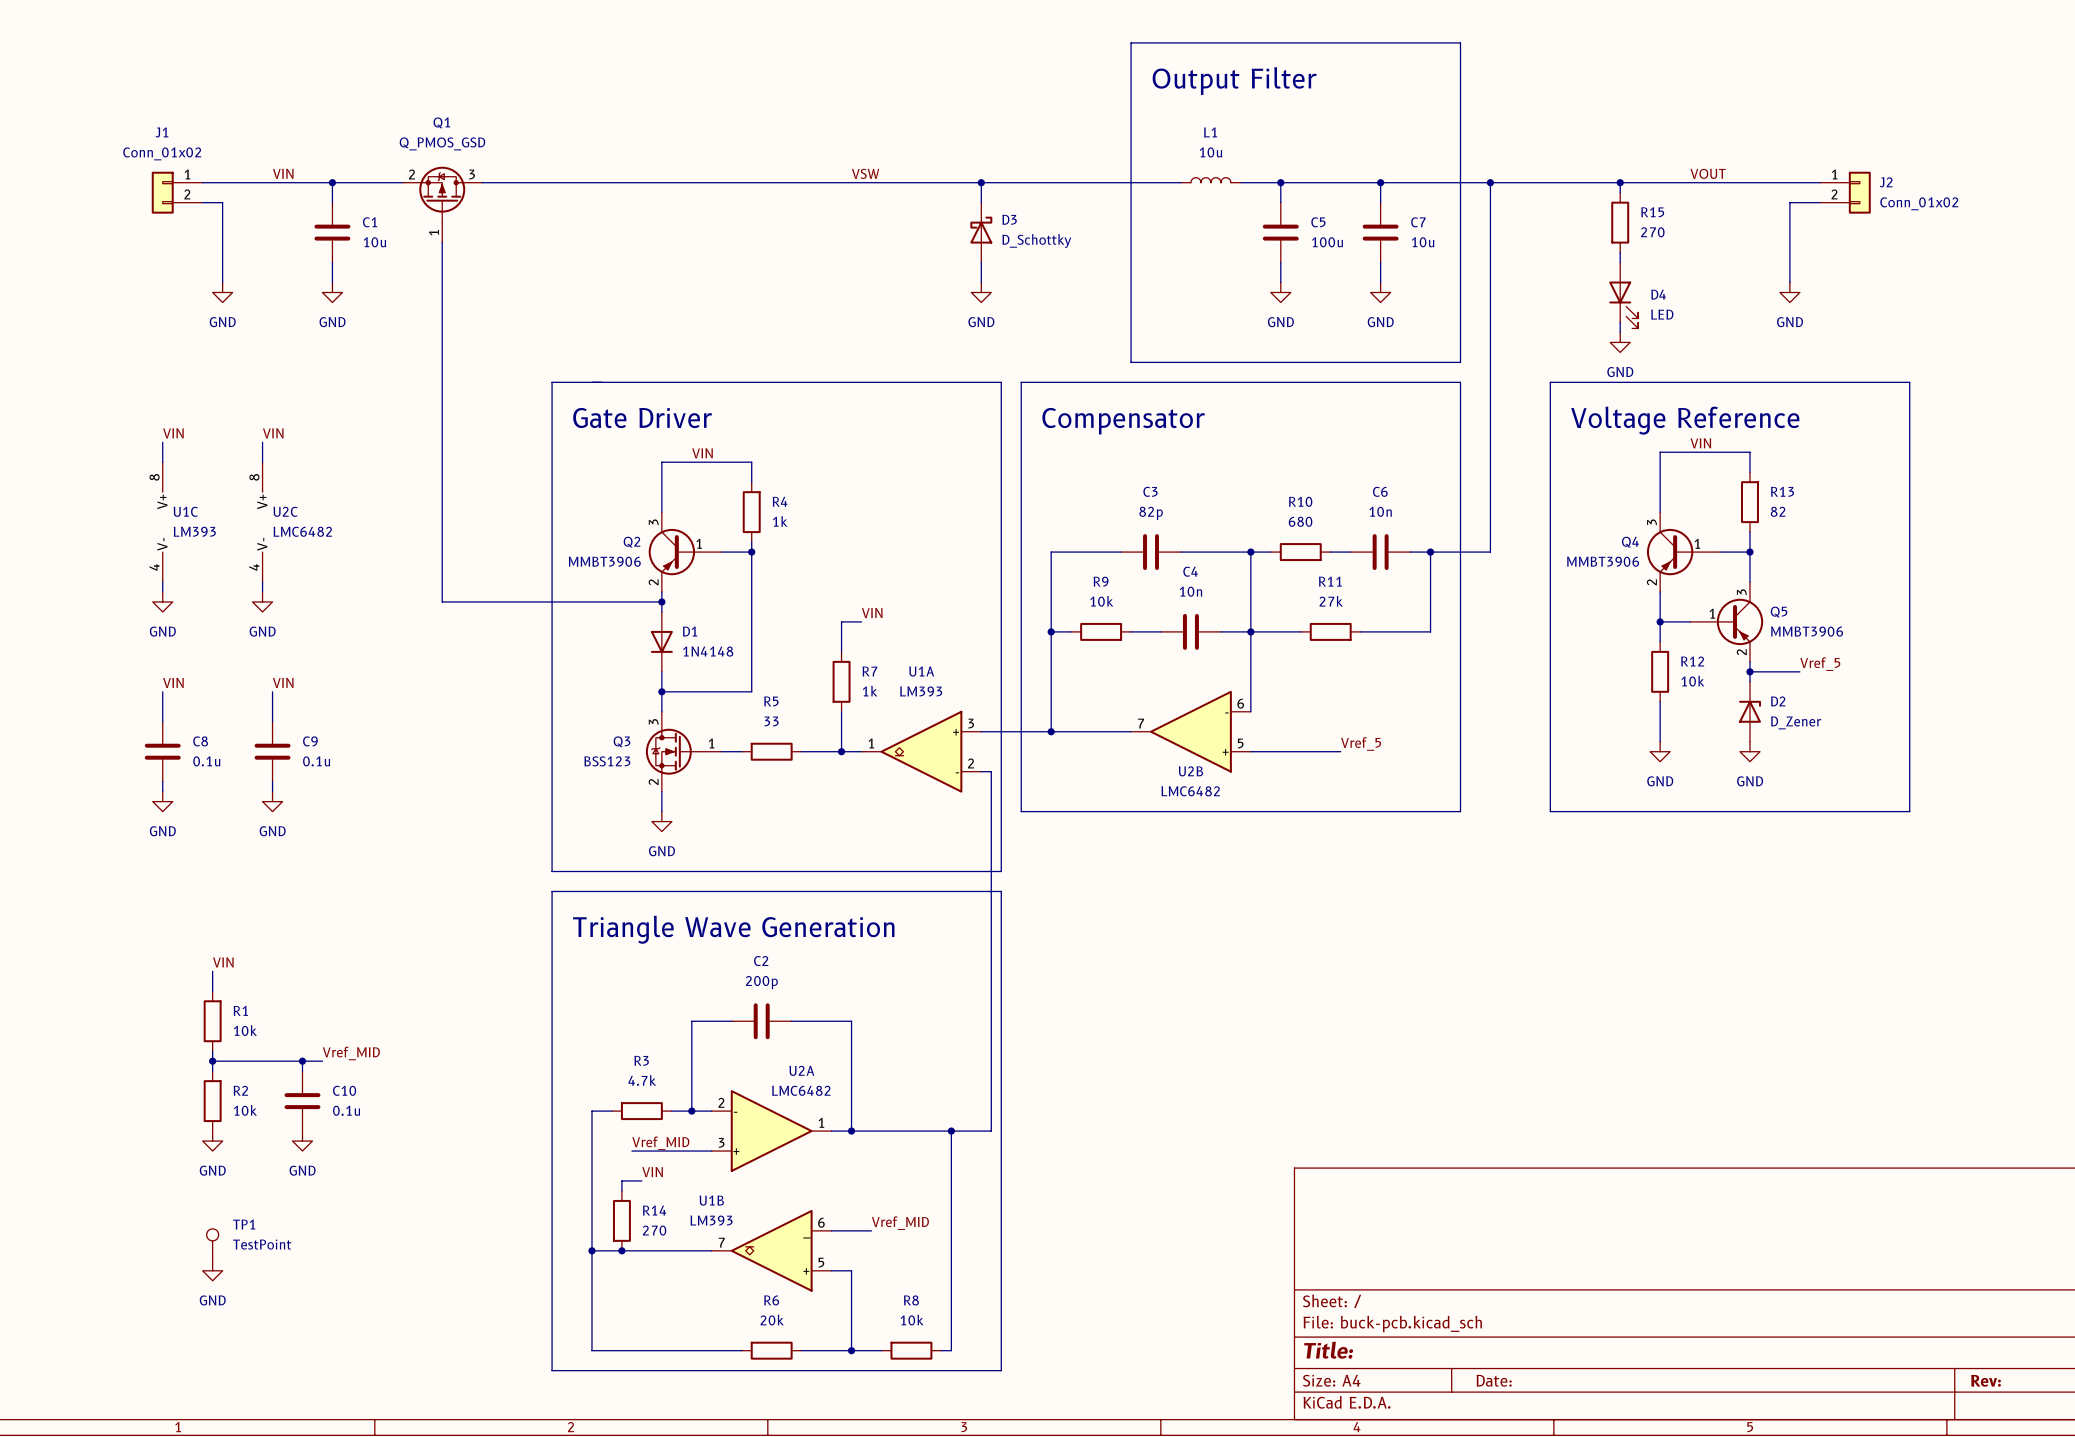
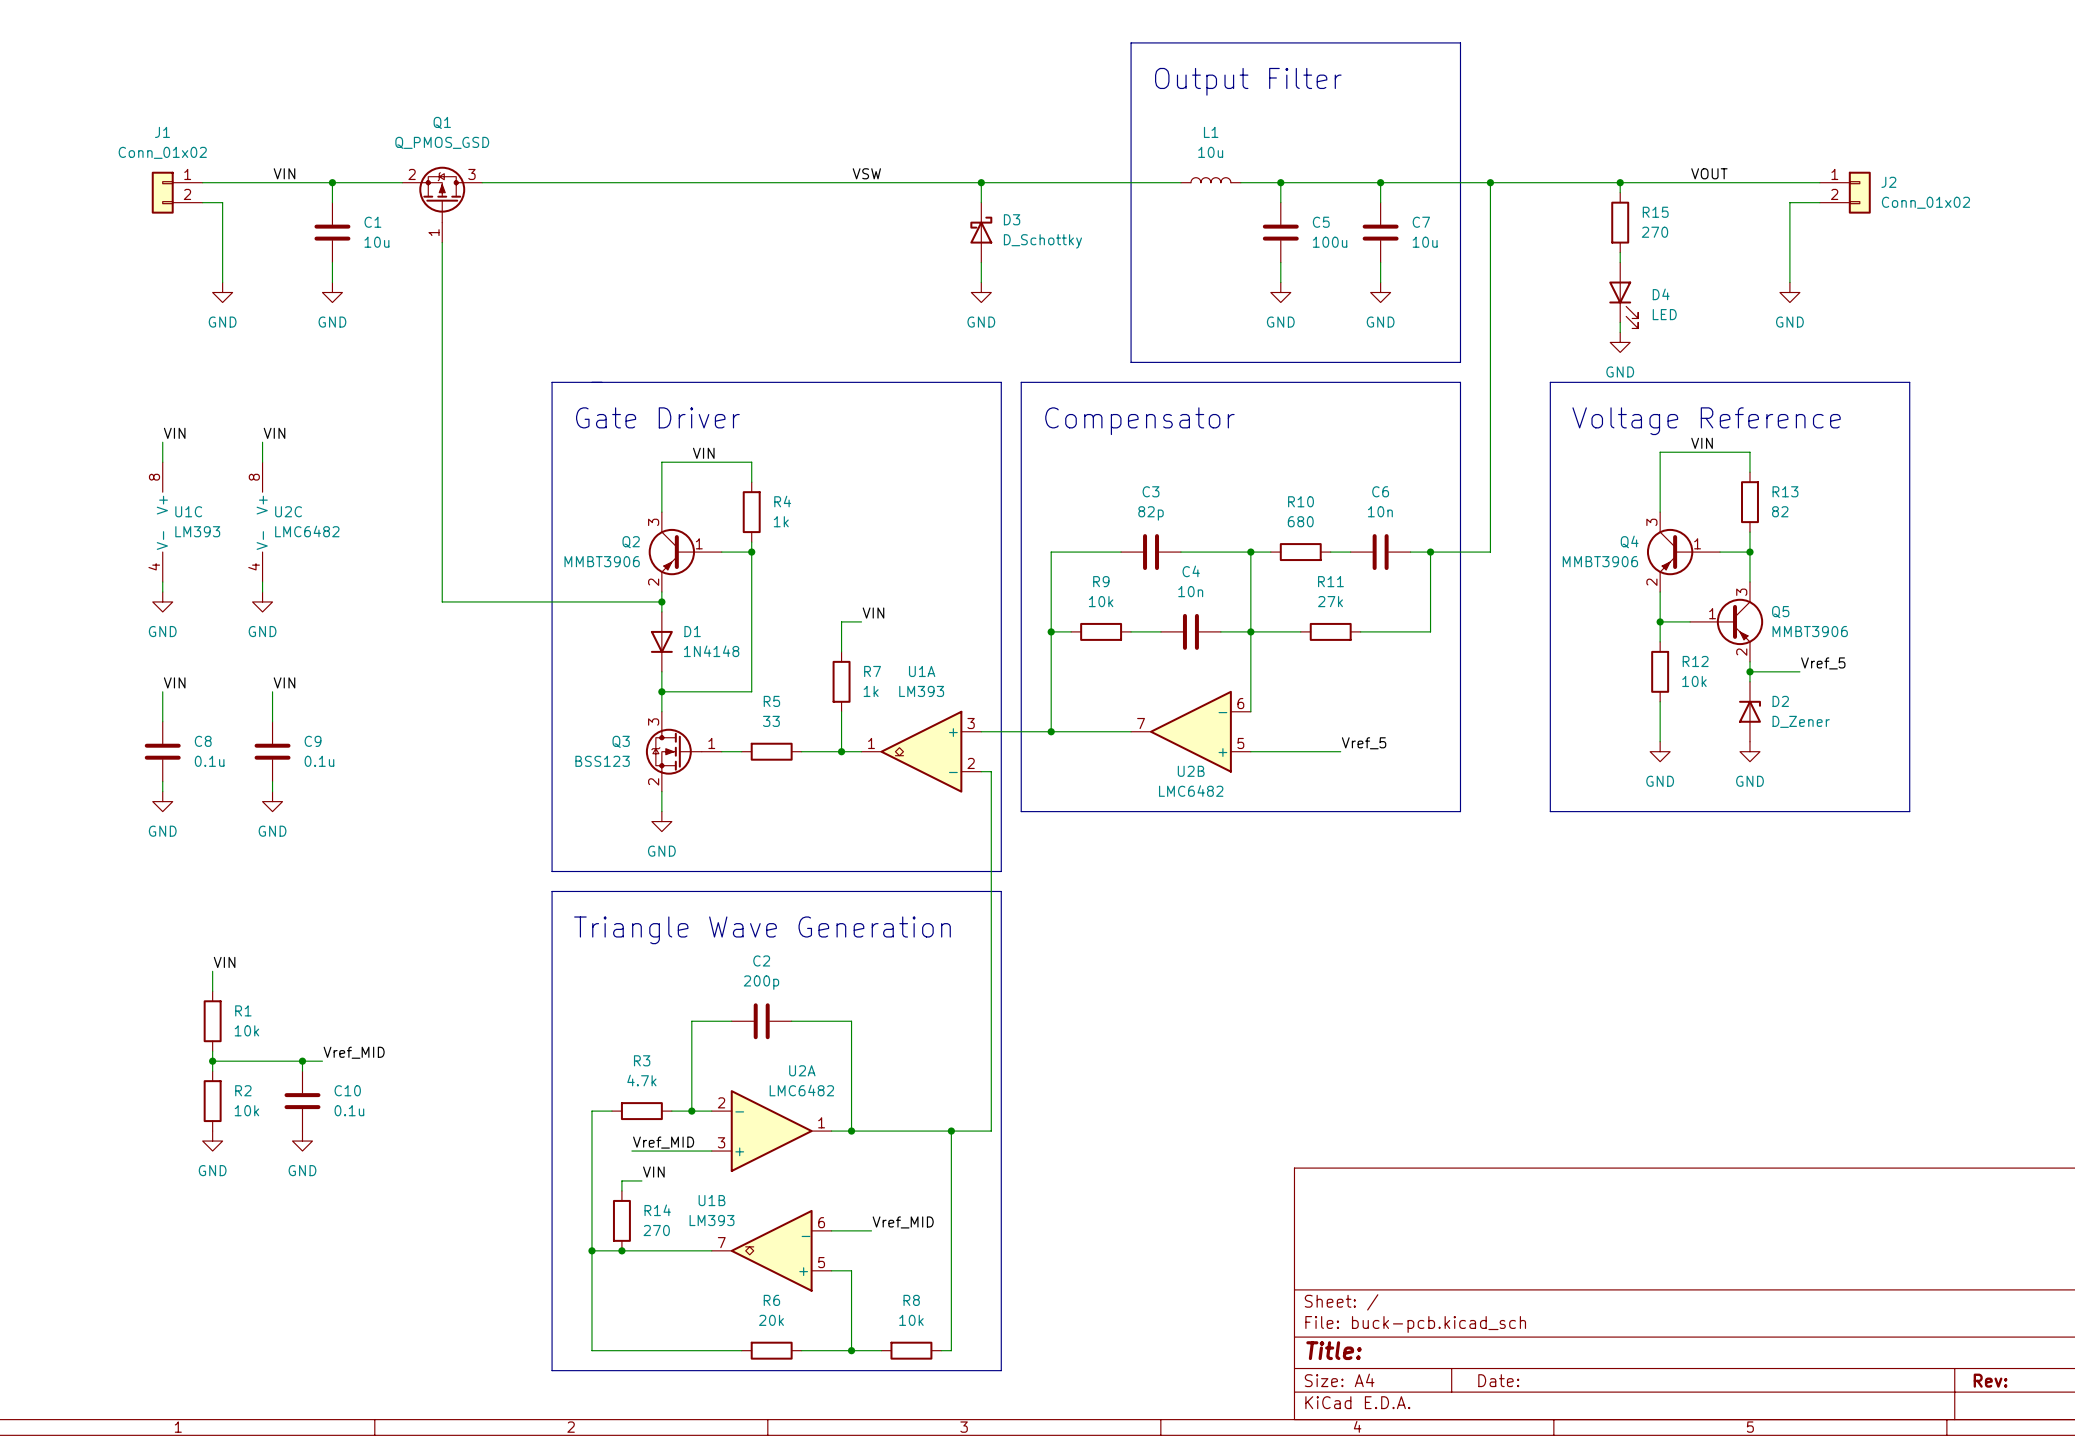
TP1: TestPoint (212, 1244) -> none
power symbol: GND (212, 1270) -> none

